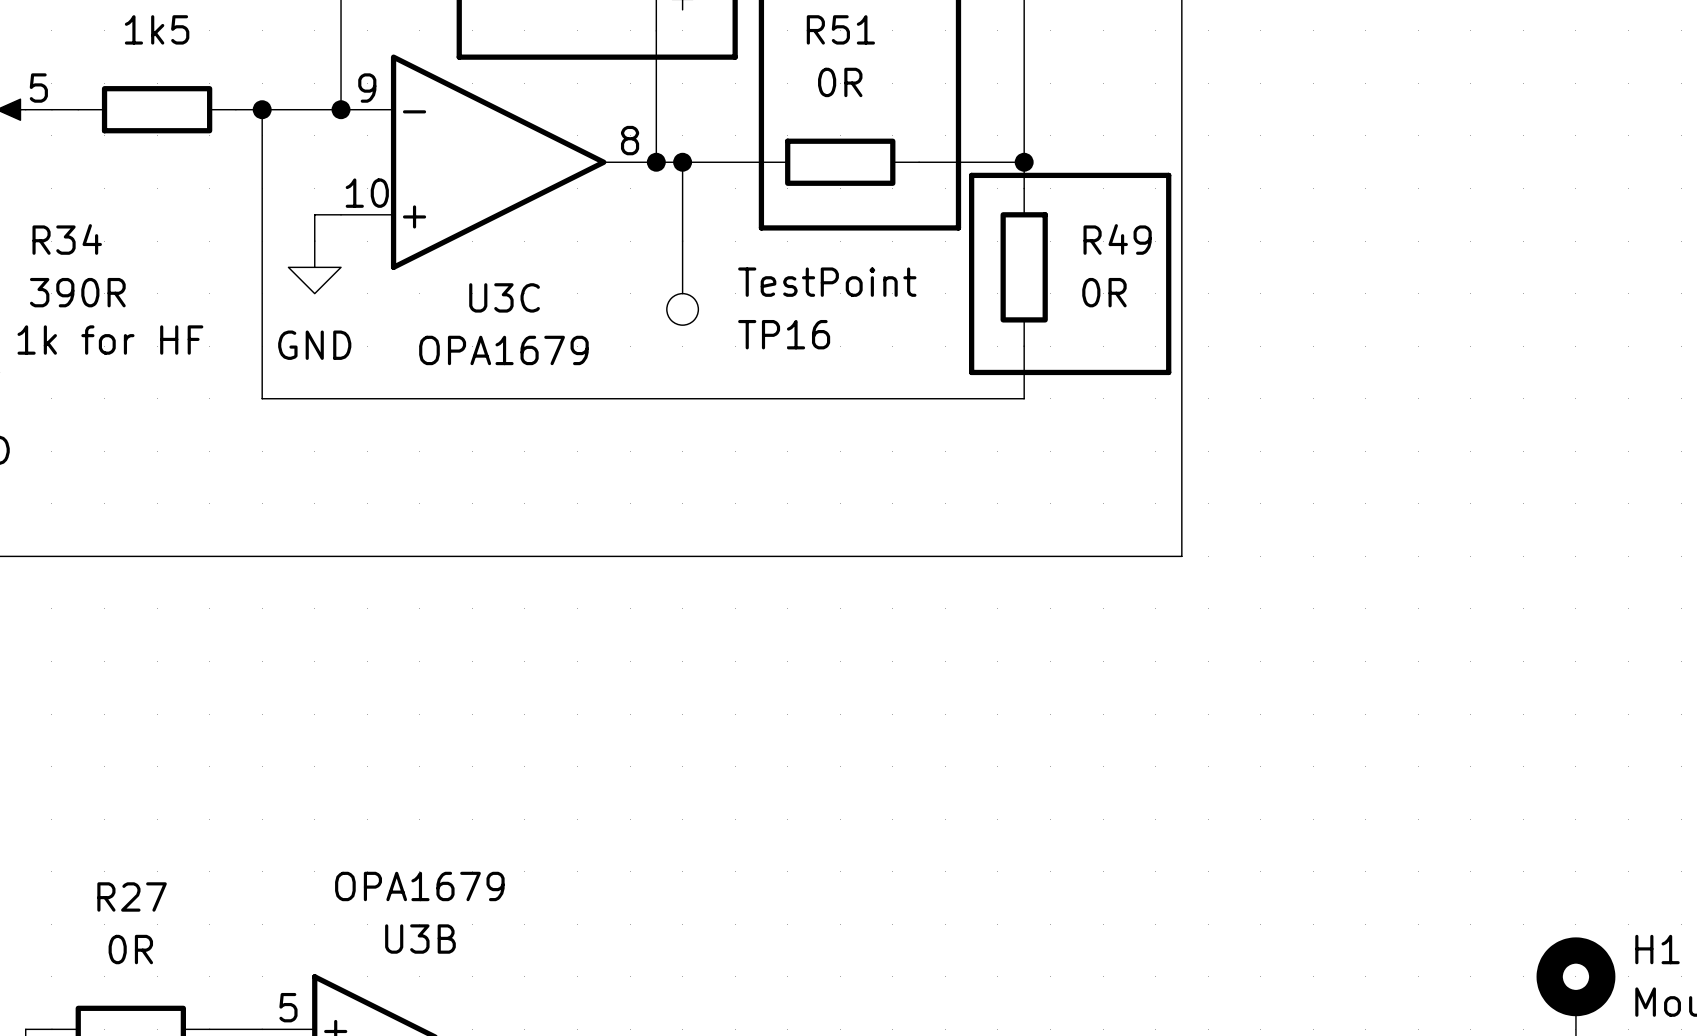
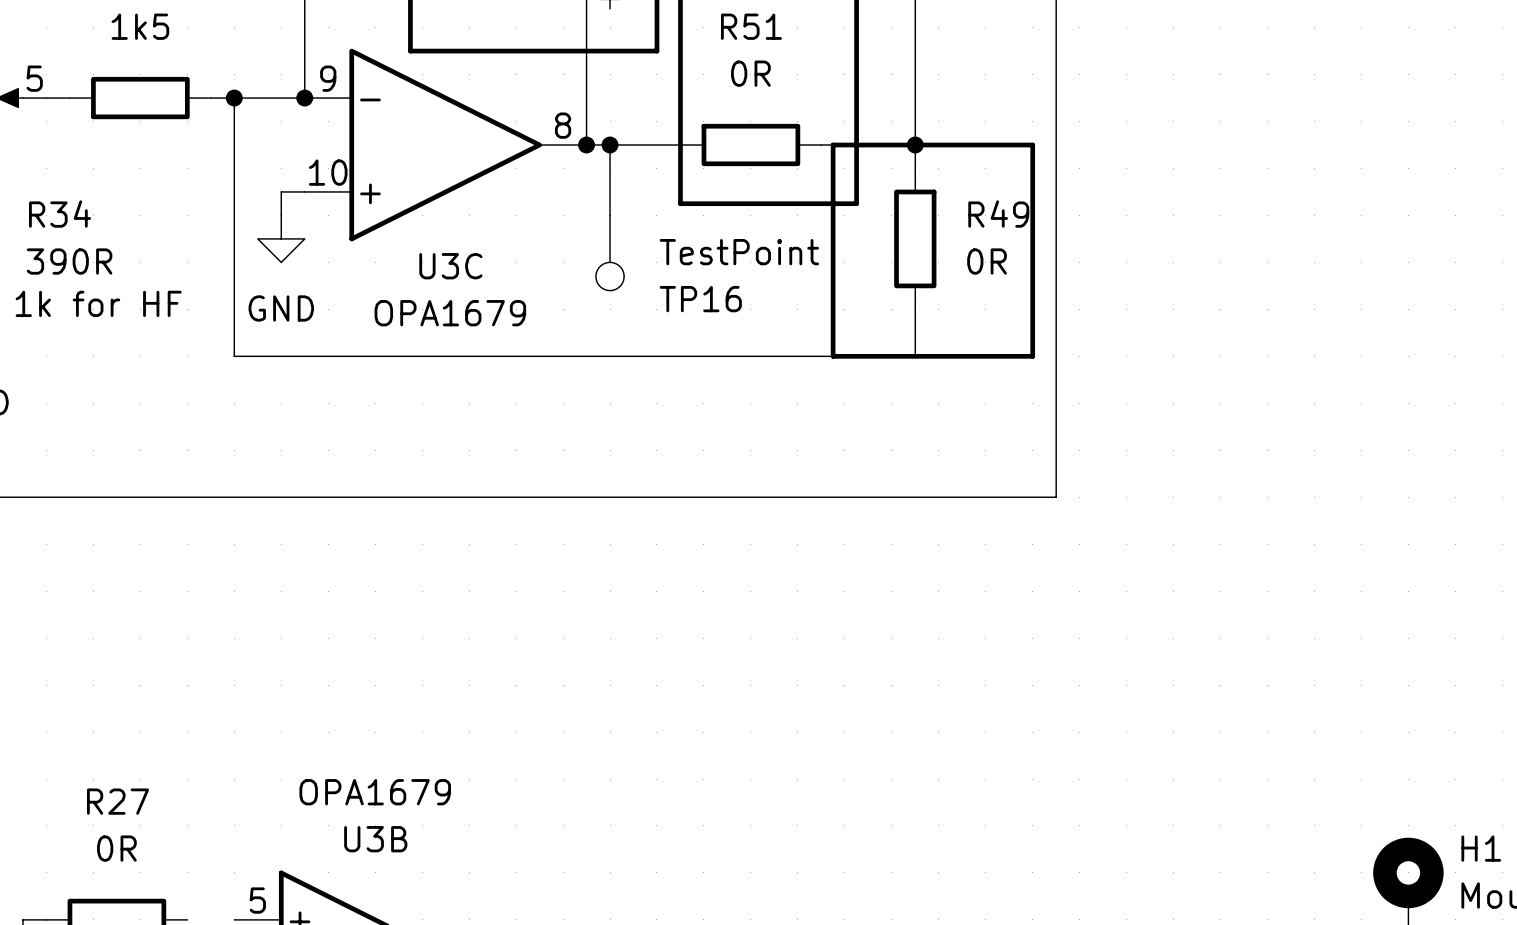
line: (971, 175) (1168, 175) (1168, 372) (971, 372) (971, 175) -> (833, 145) (833, 356) (1032, 356) (1032, 145) (833, 145)
wire: (209, 1029) (262, 1029) -> none

